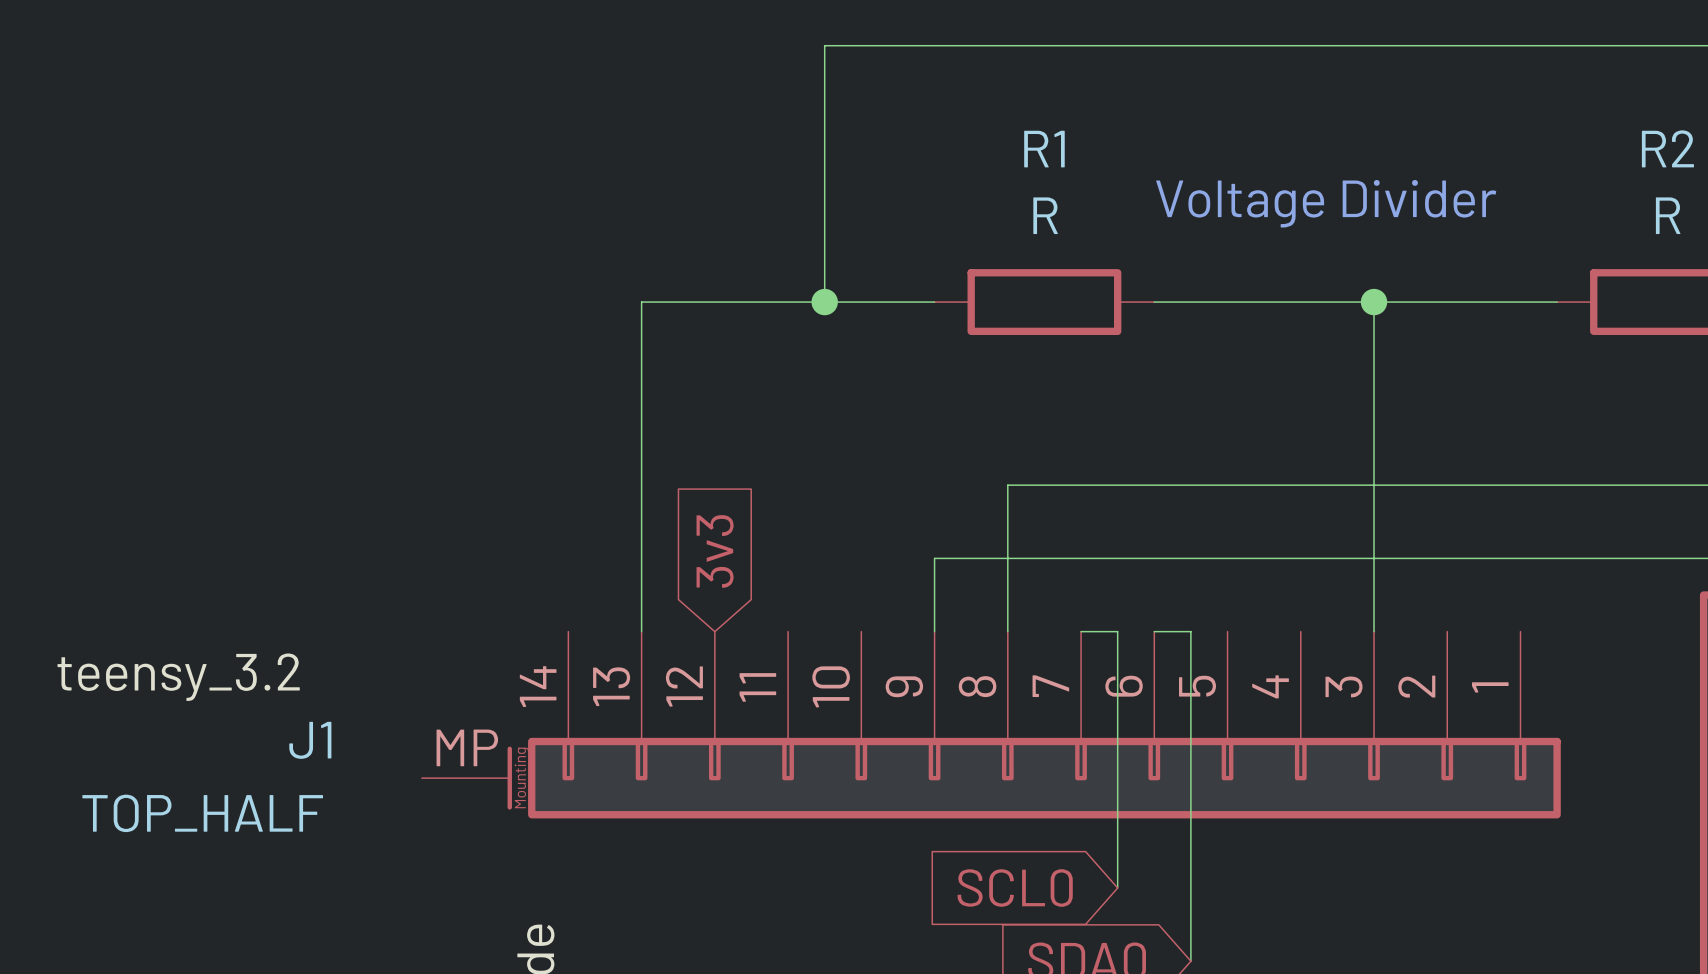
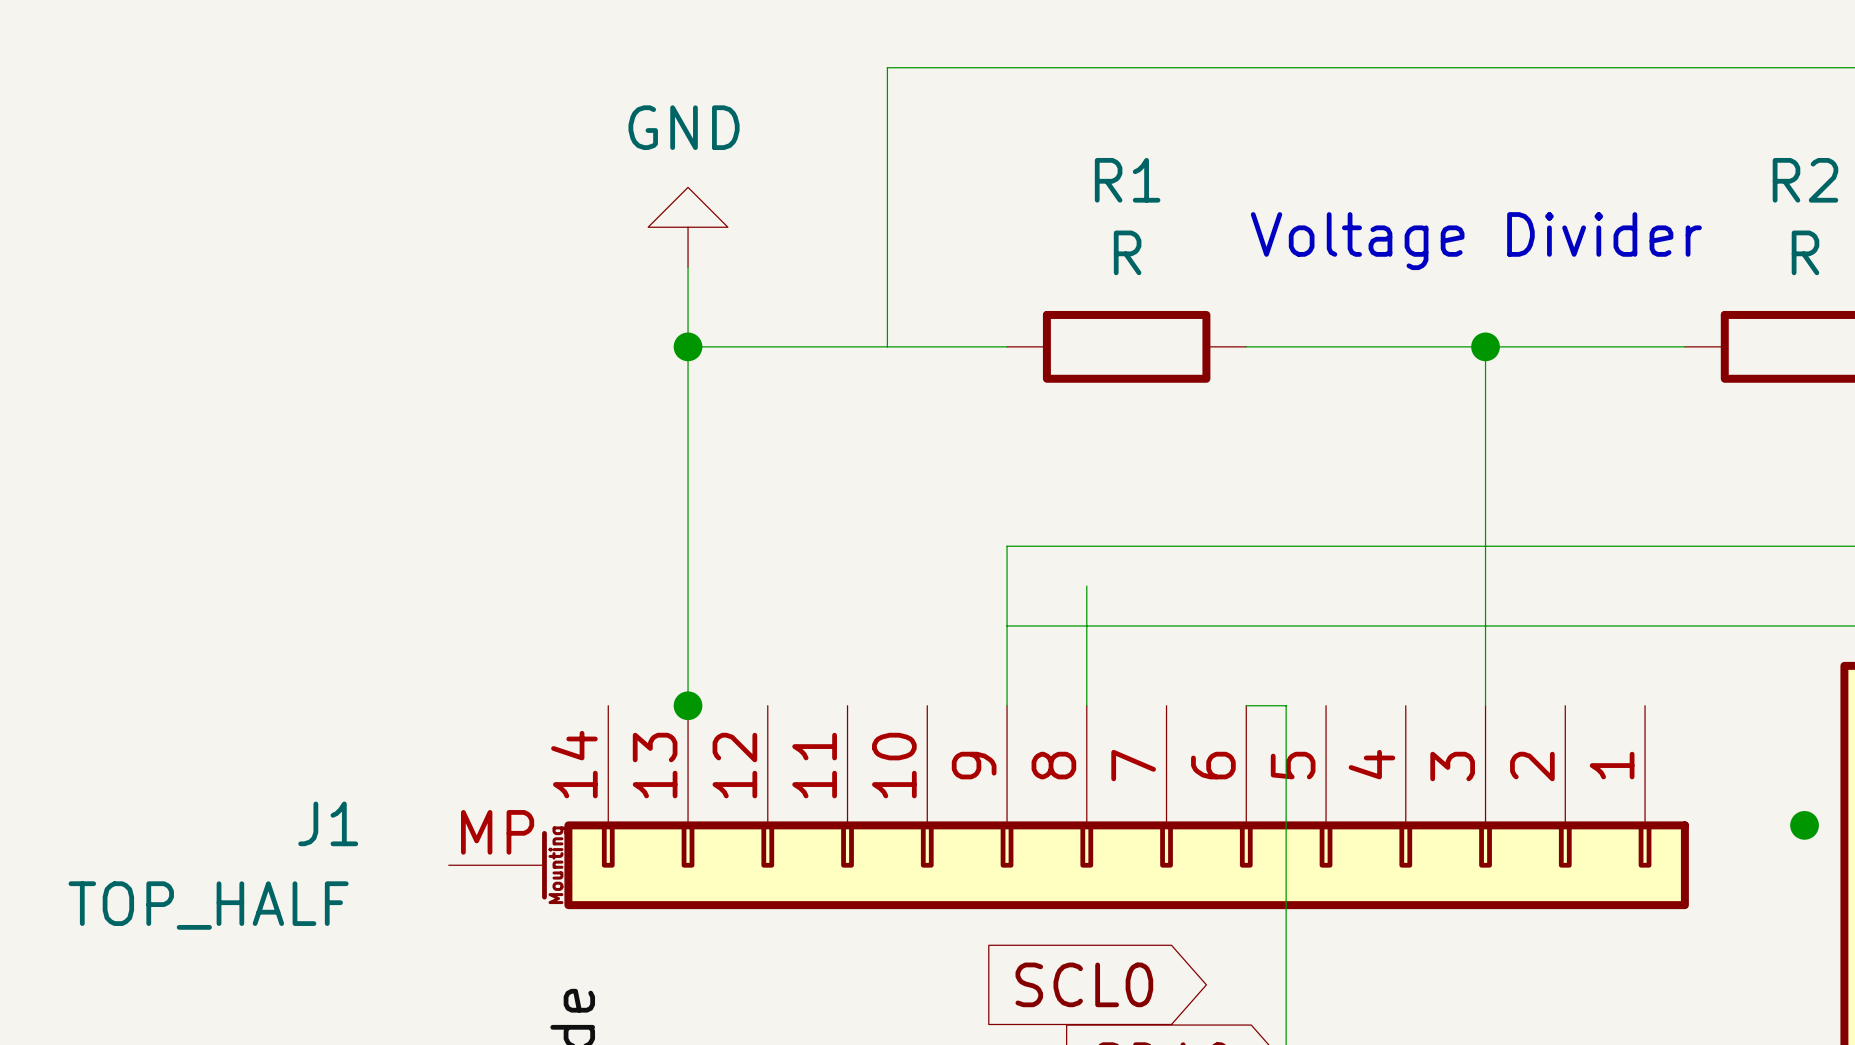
power symbol: none -> GND (688, 227)
wire: none -> (688, 267) (688, 346)
junction: none -> (688, 346)
junction: (824, 302) -> none
wire: (1007, 485) (1007, 521) -> (1086, 546) (1007, 546) (1007, 626)
global label: 3v3 (715, 551) -> none
junction: none -> (688, 705)
wire: (1081, 631) (1117, 631) (1117, 887) -> none
label: teensy_3.2 (178, 677) -> none
junction: none -> (1804, 825)

